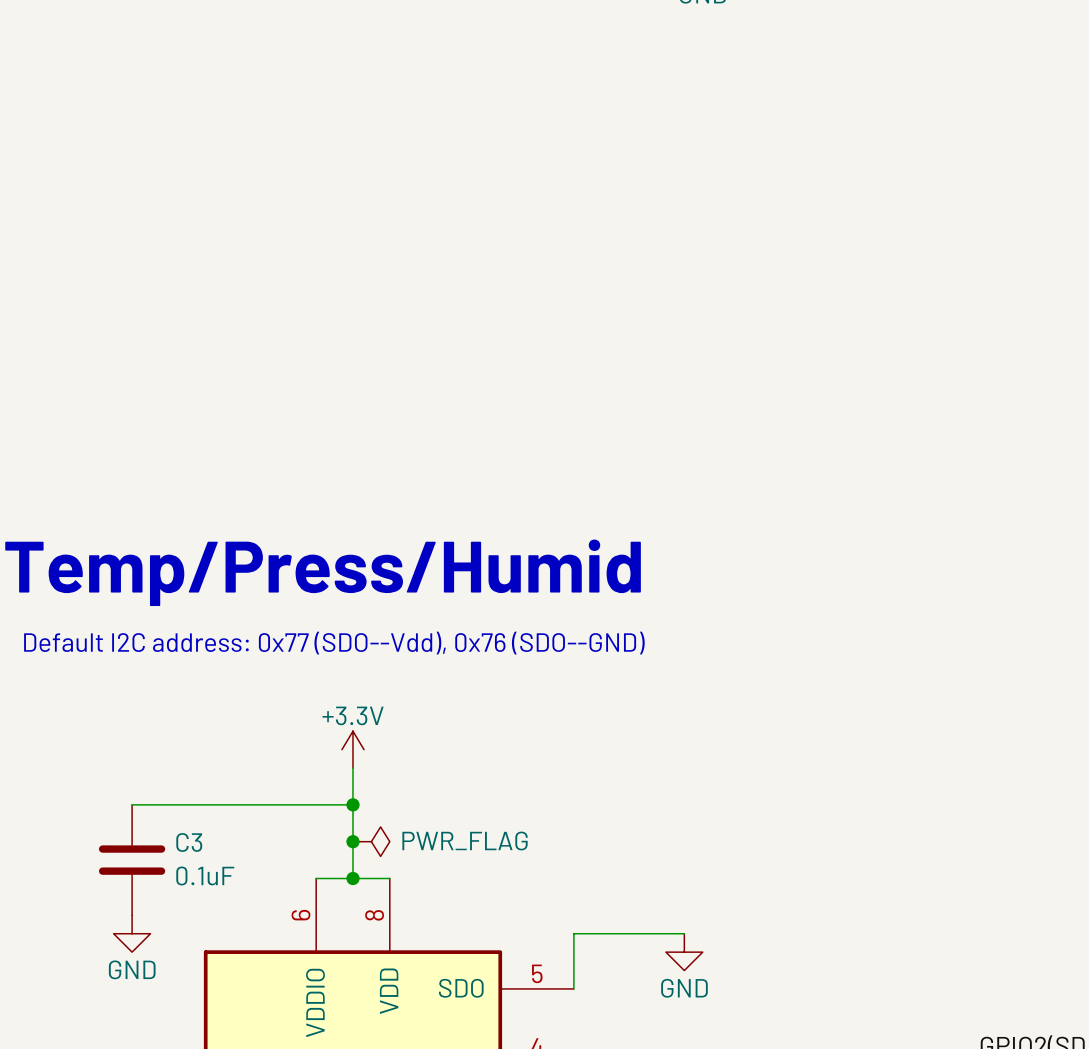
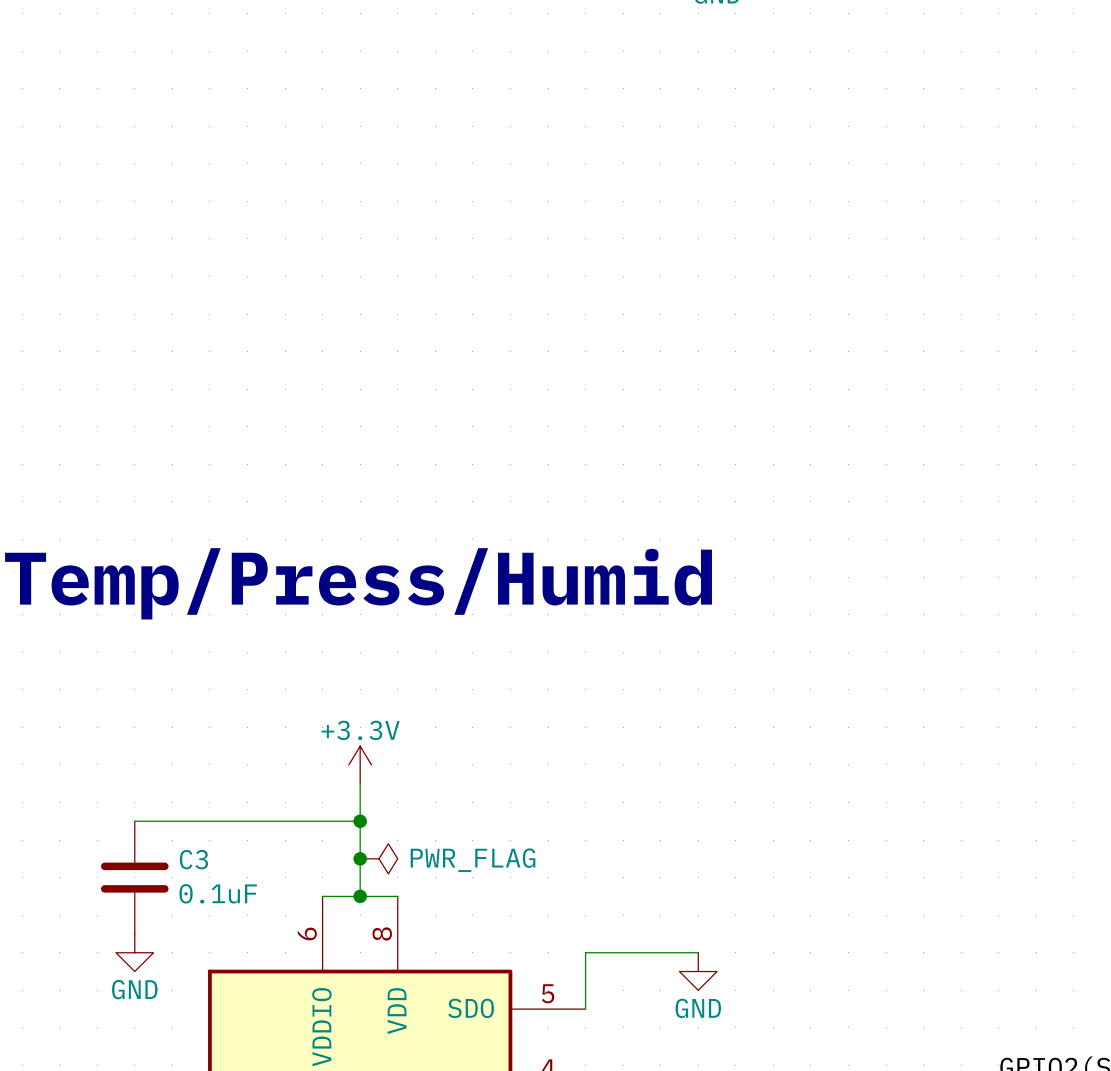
text: Default I2C address: 0x77 (SDO--Vdd), 0x76 (SDO--GND) (334, 643) -> none

